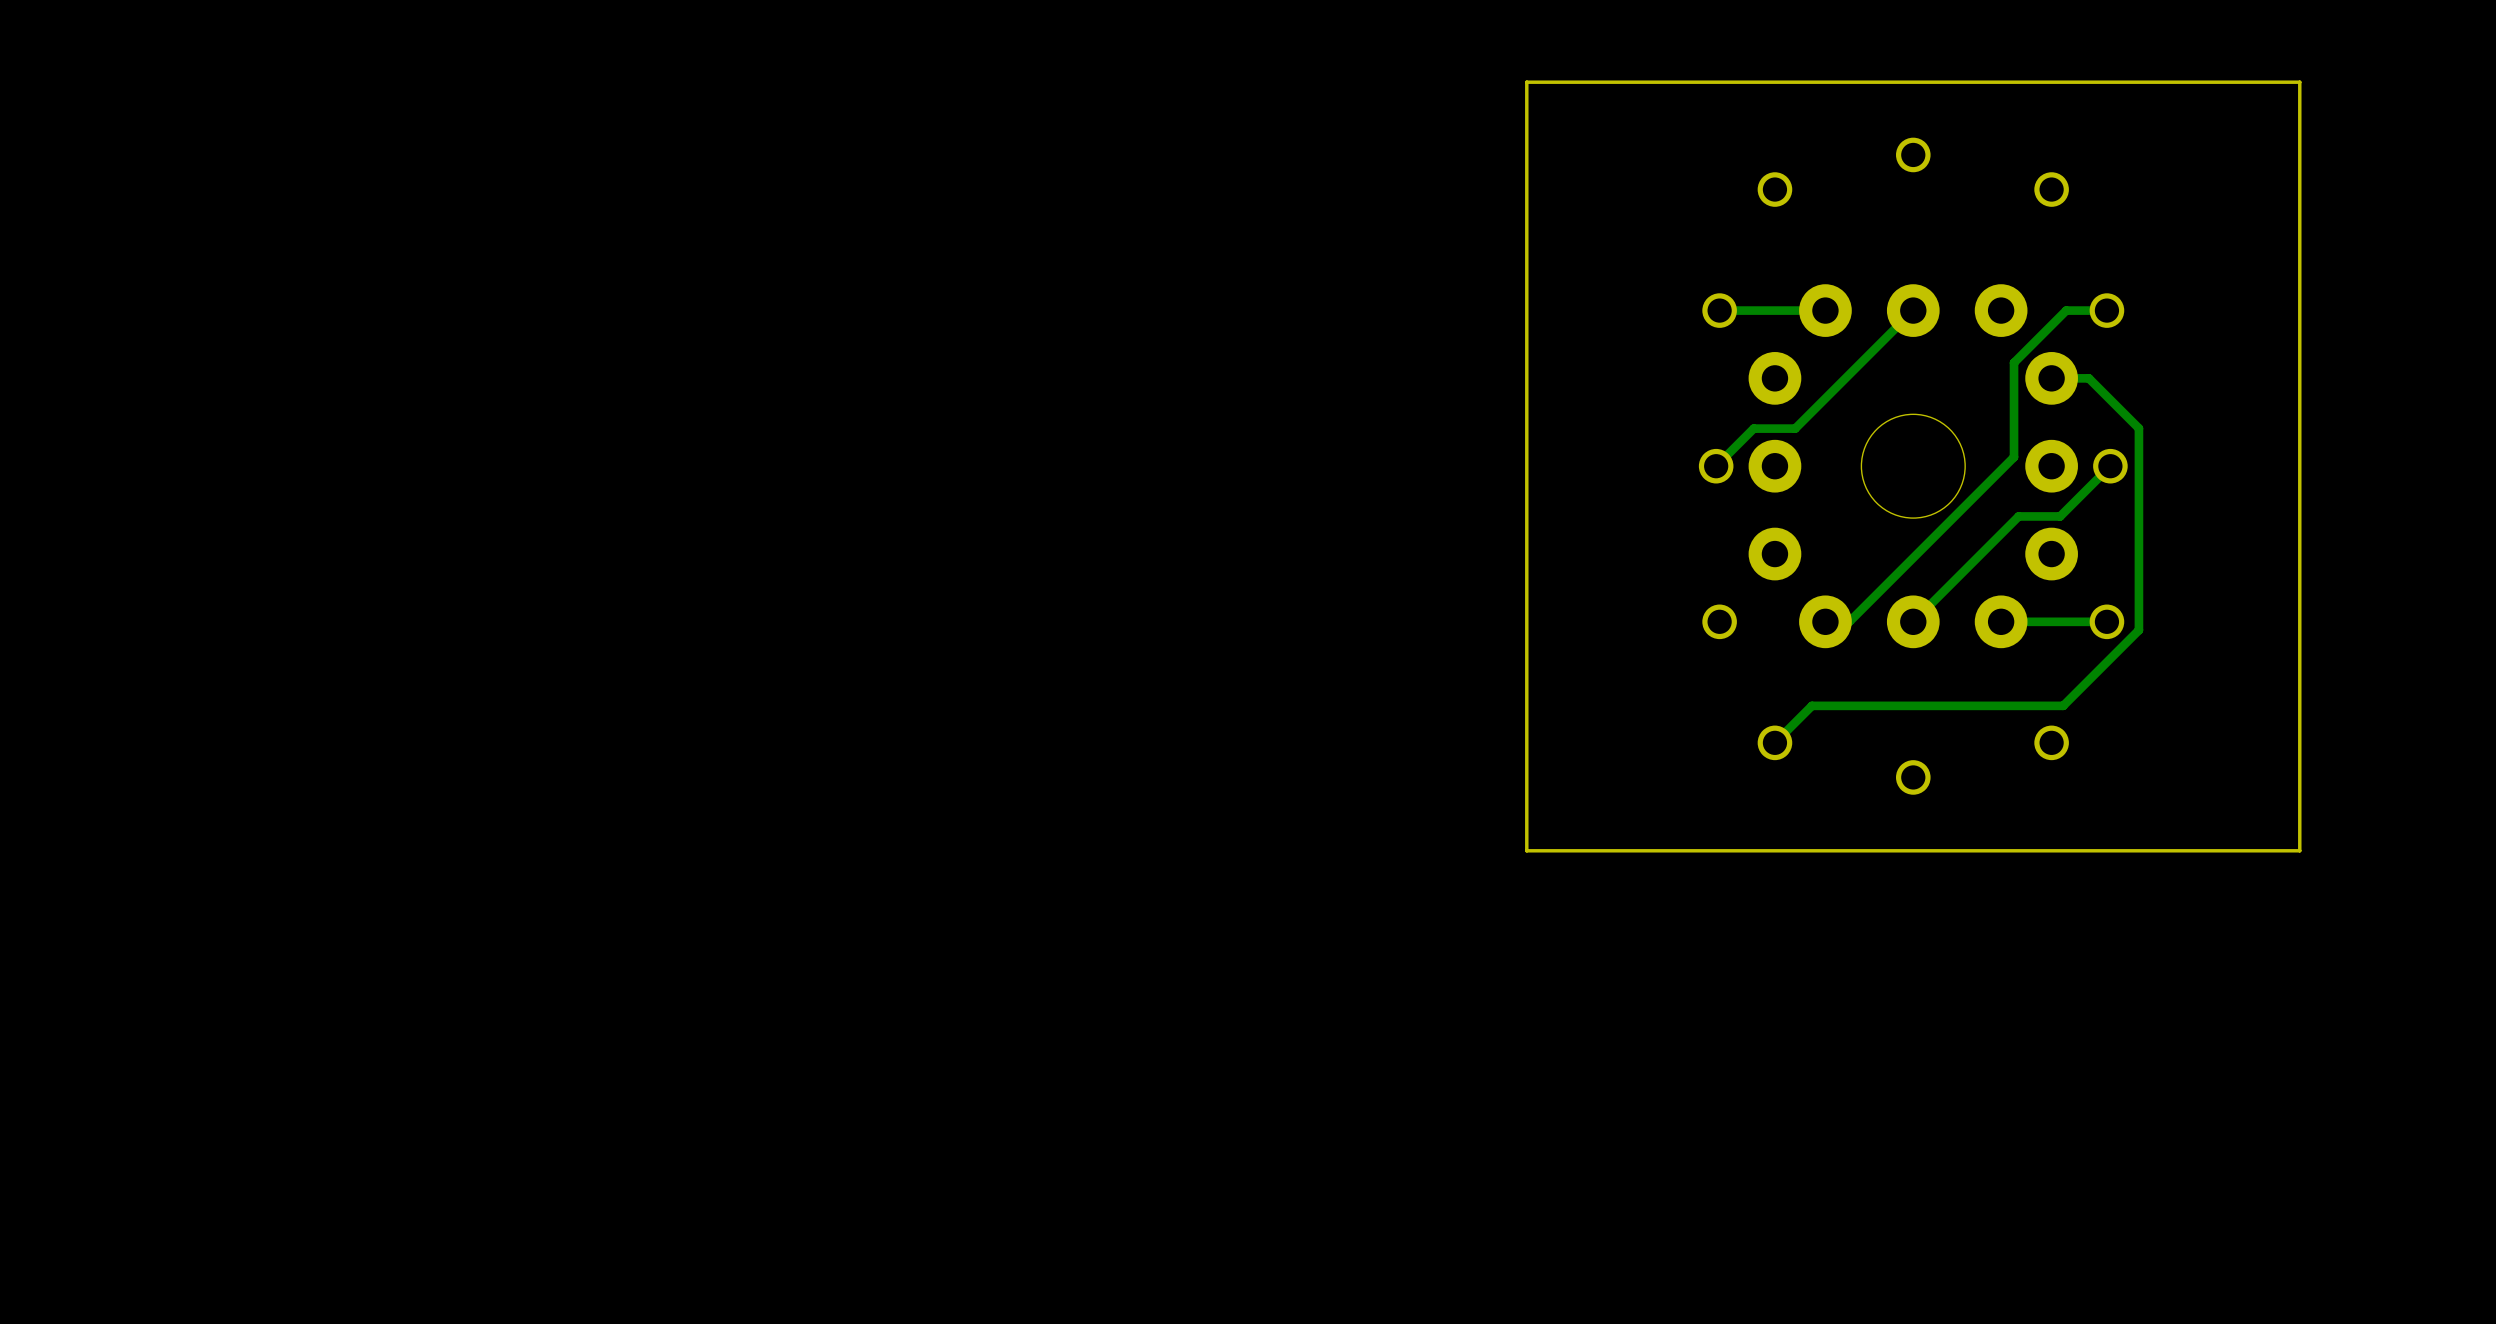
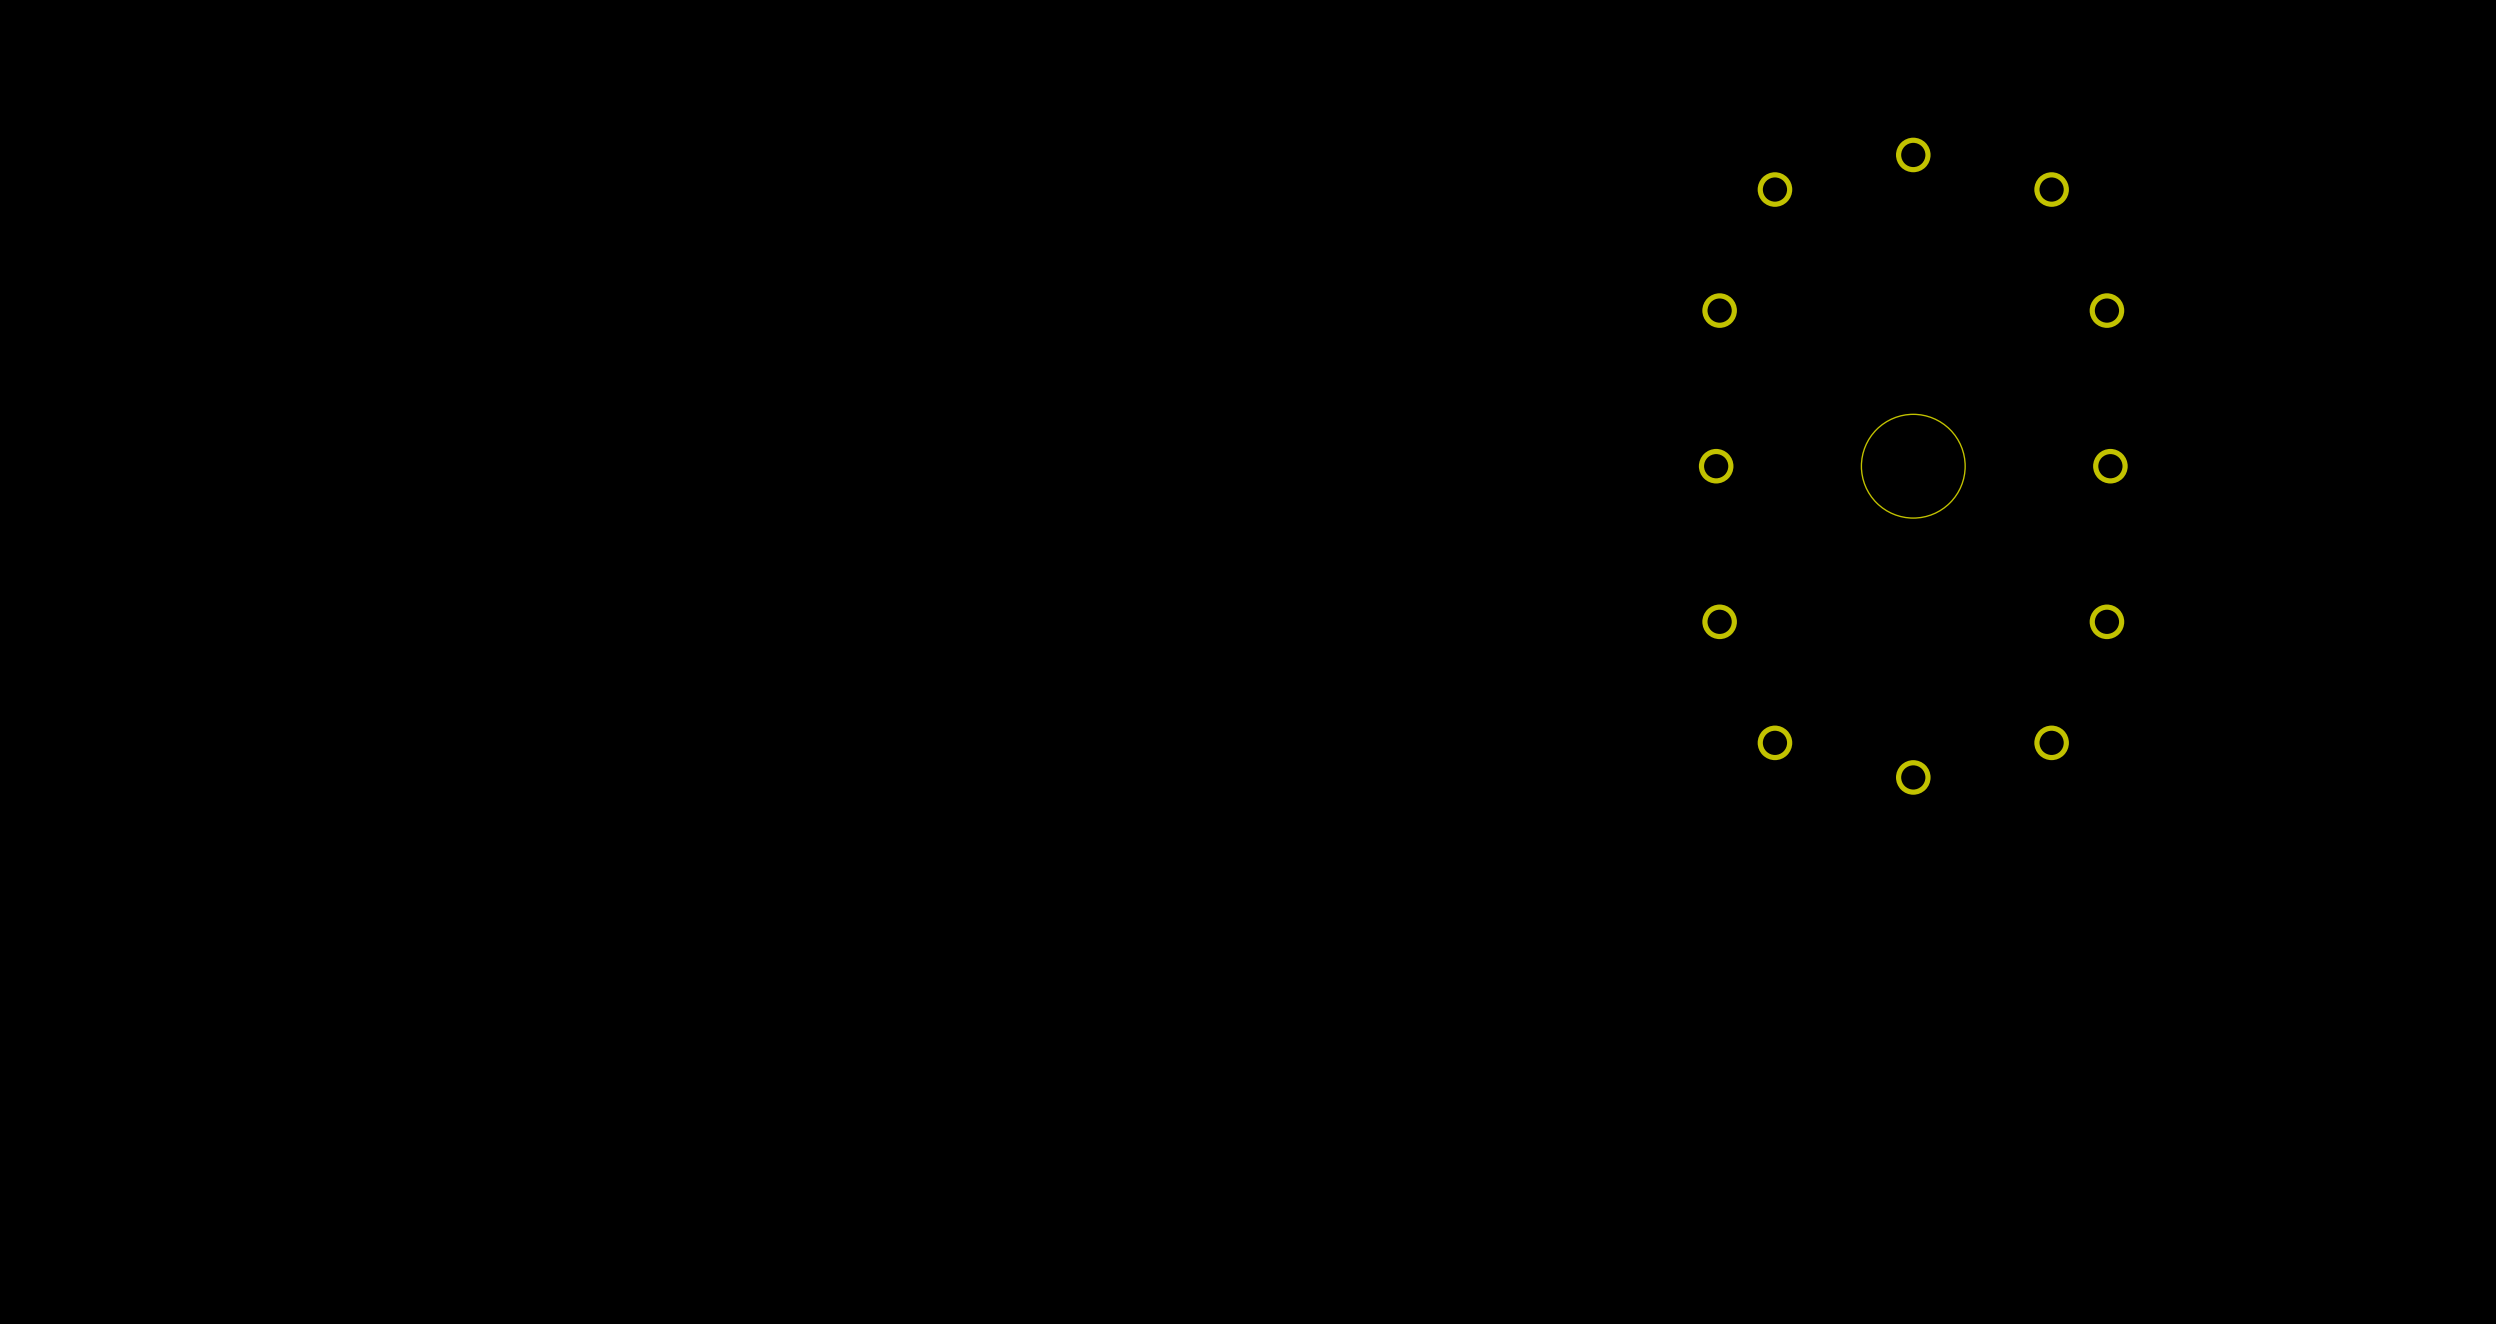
board edge: (2299, 82) (1526, 82) (1526, 850) (2299, 850) (2299, 82) -> none
track: (1825, 310) (1719, 310) -> none
track: (1913, 310) (1795, 428) (1753, 428) (1716, 466) -> none
track: (2106, 310) (2066, 310) (2014, 362) (2014, 457) (1849, 621) (1825, 621) -> none
track: (2051, 378) (2088, 378) (2138, 428) (2138, 630) (2063, 705) (1811, 705) (1774, 742) -> none
part: (1913, 466) -> none
track: (2110, 466) (2060, 516) (2018, 516) (1913, 621) -> none
track: (2106, 621) (2001, 621) -> none

